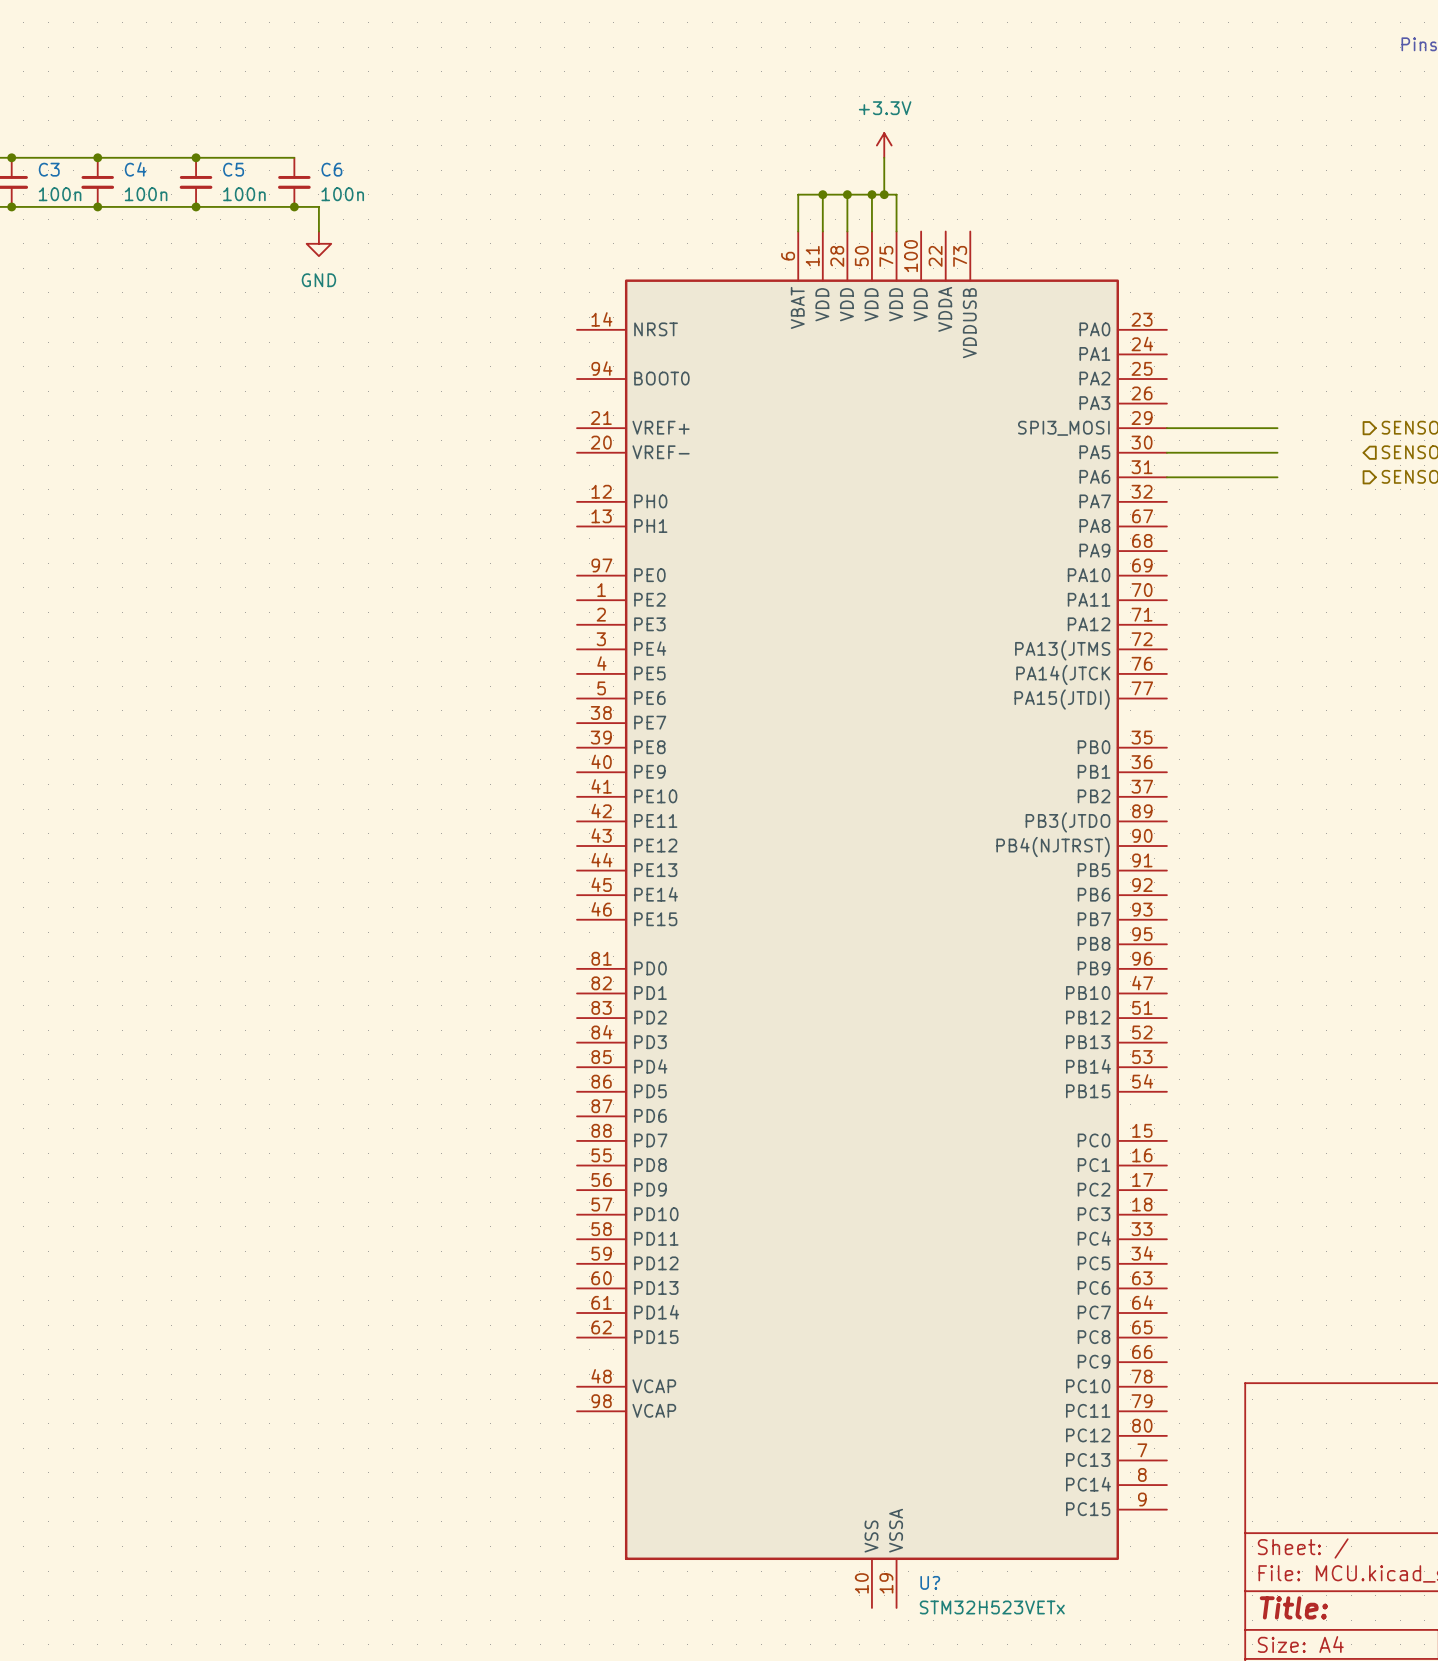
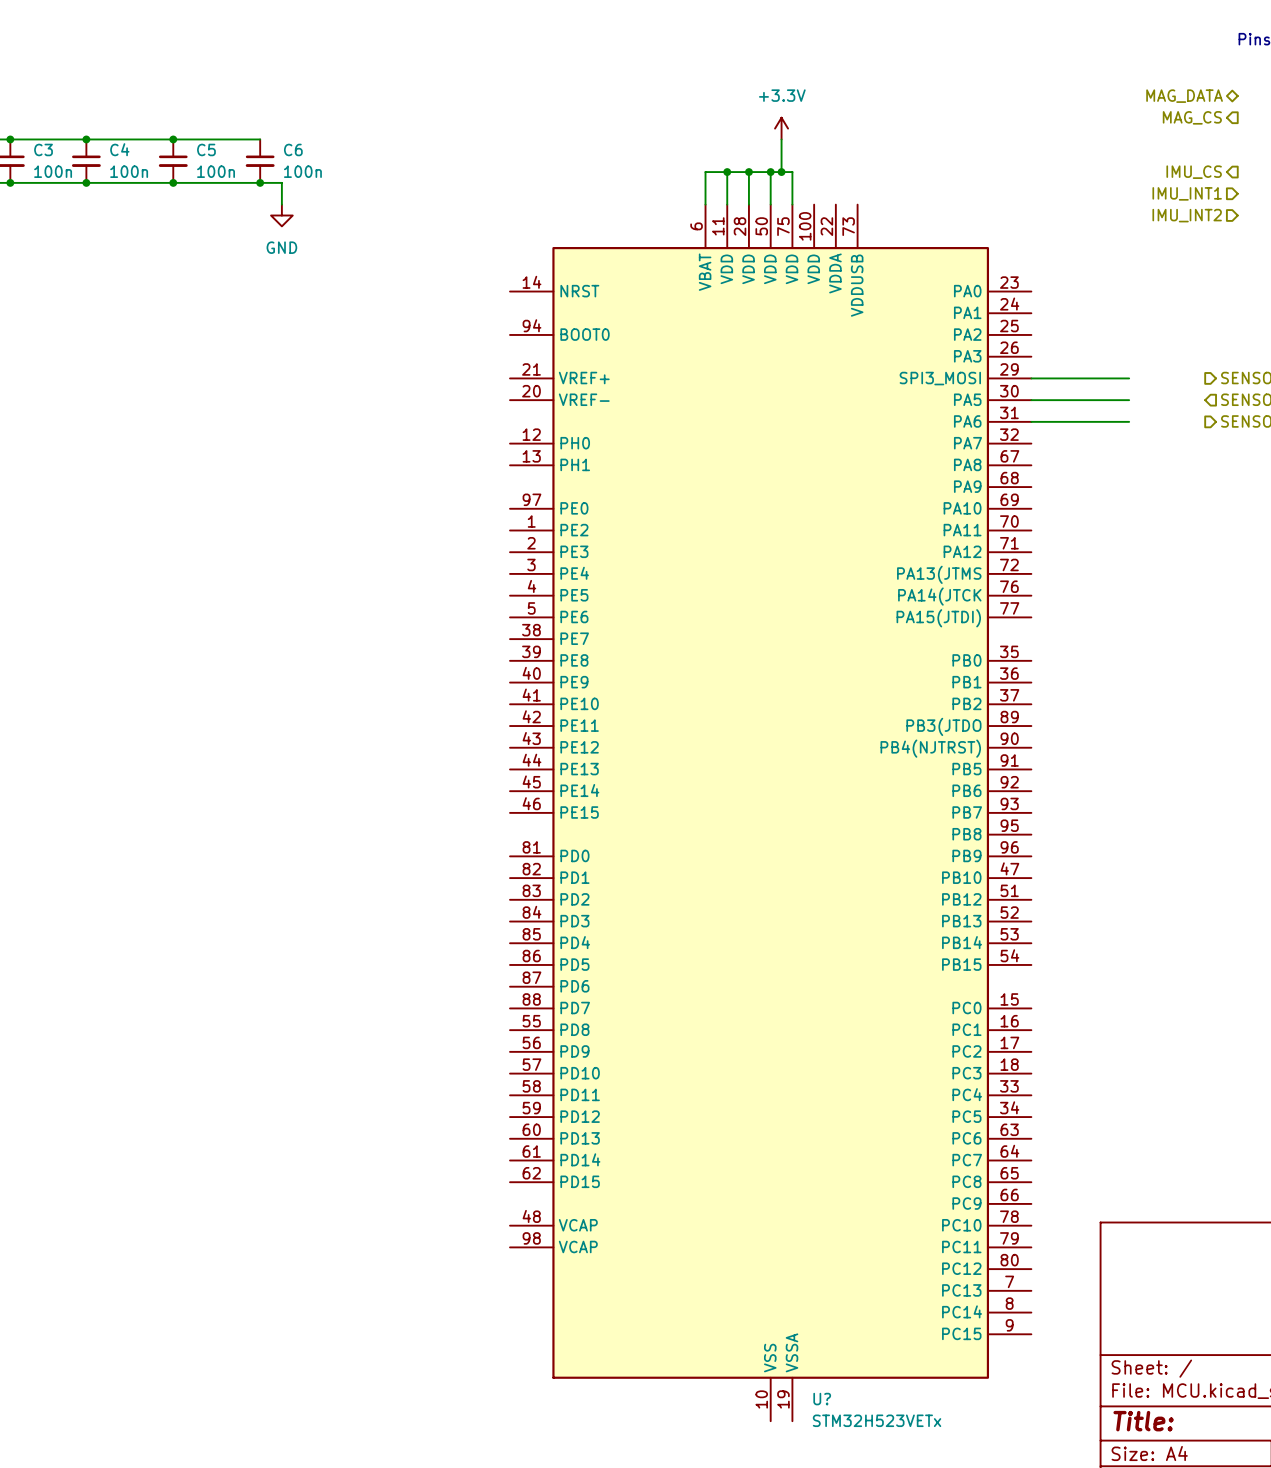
hierarchical label: none -> MAG_DATA (1184, 96)
hierarchical label: none -> MAG_CS (1192, 117)
hierarchical label: none -> IMU_CS (1194, 172)
hierarchical label: none -> IMU_INT1 (1187, 193)
hierarchical label: none -> IMU_INT2 (1187, 215)

